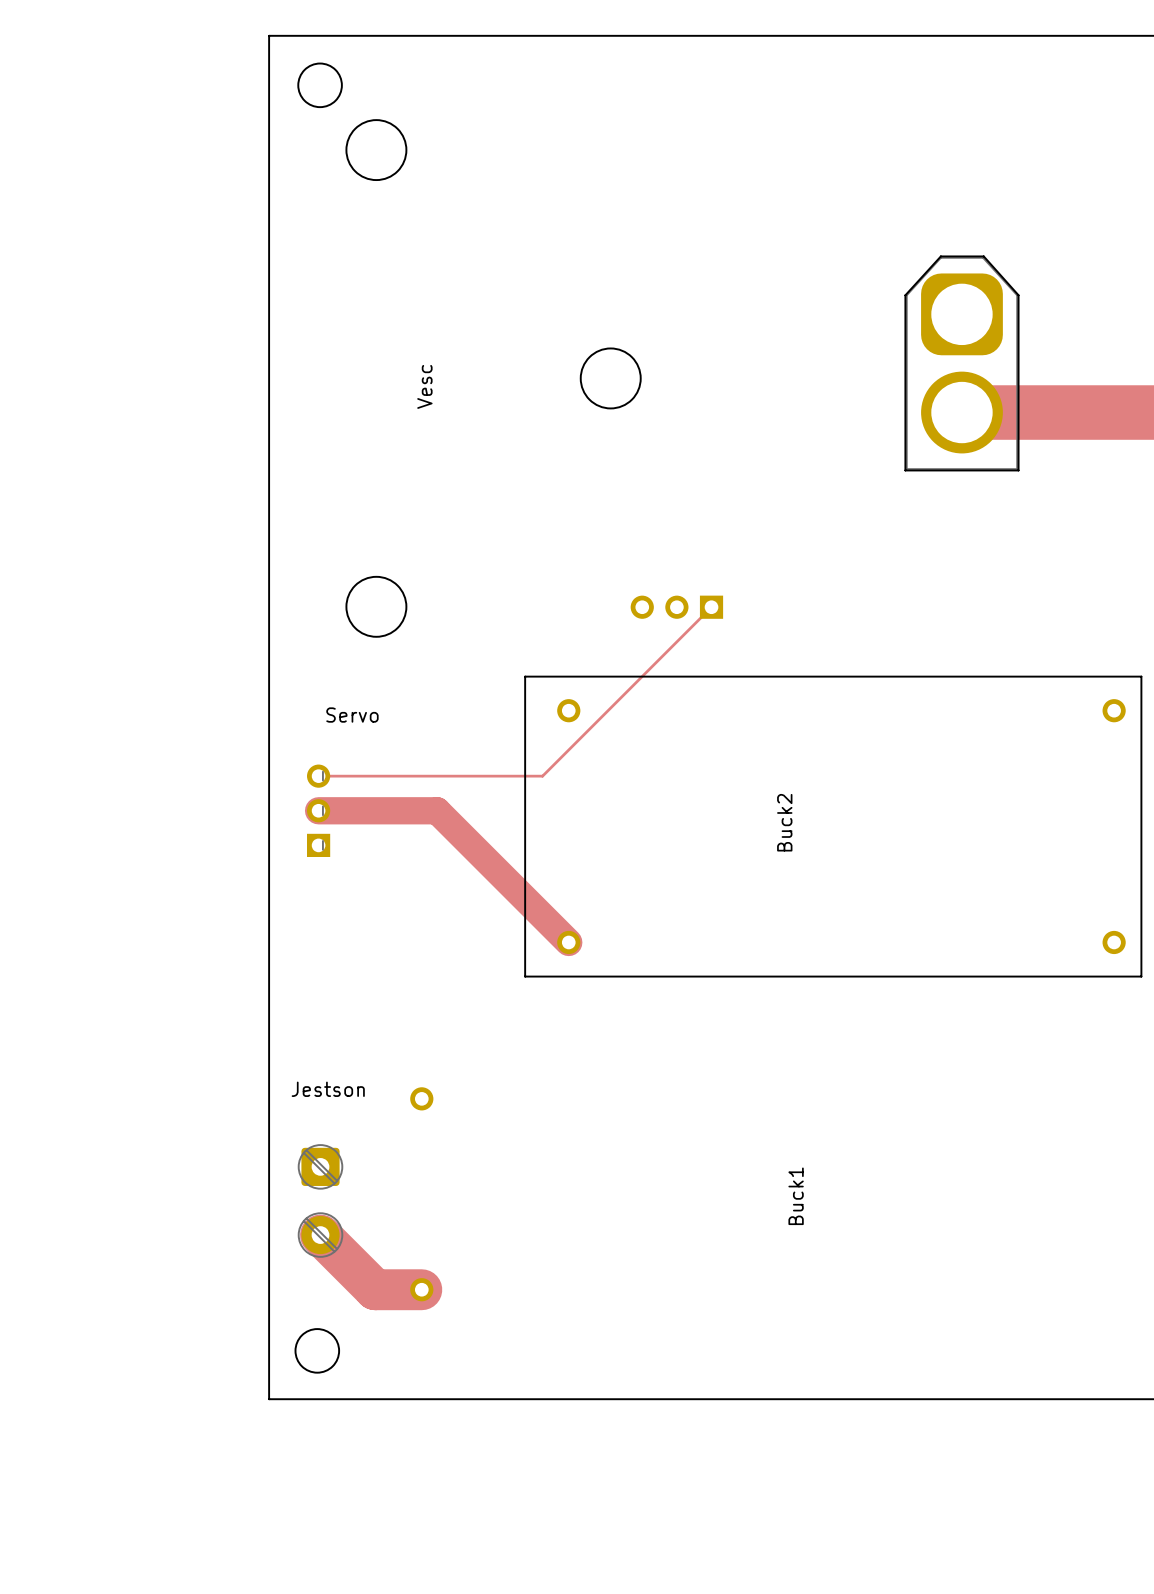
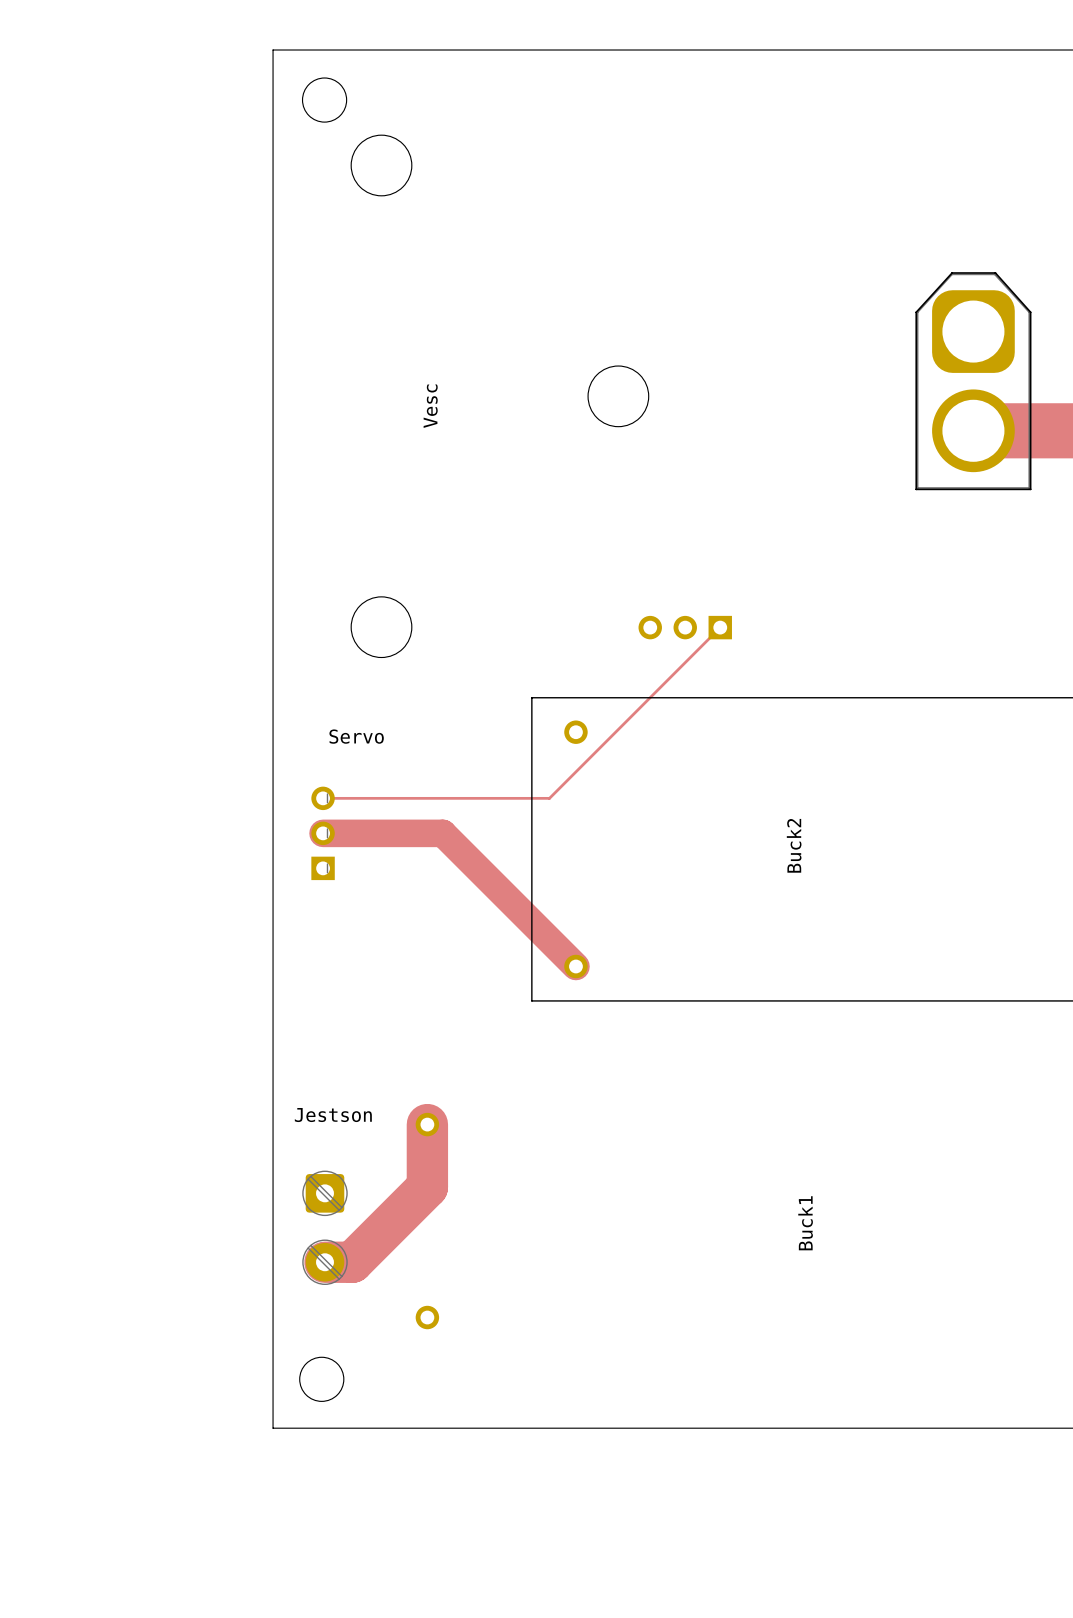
track: (320, 1235) (375, 1289) (421, 1289) -> (324, 1262) (352, 1262) (427, 1187) (427, 1124)

